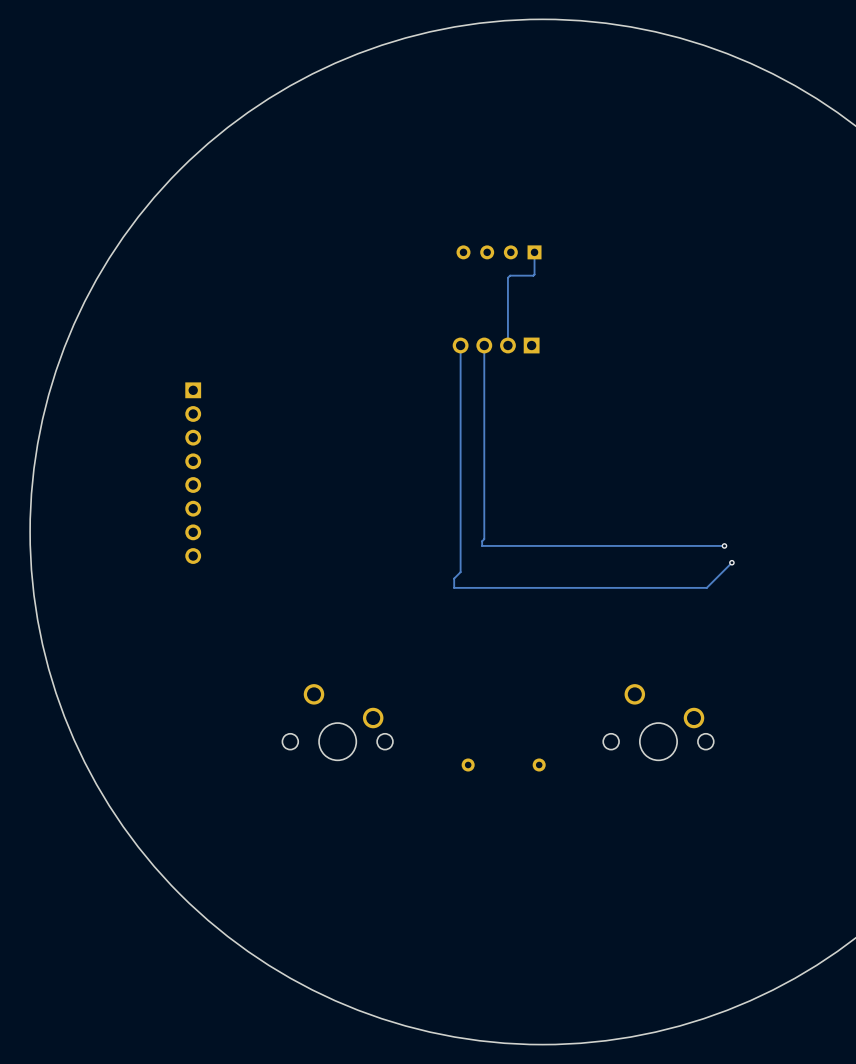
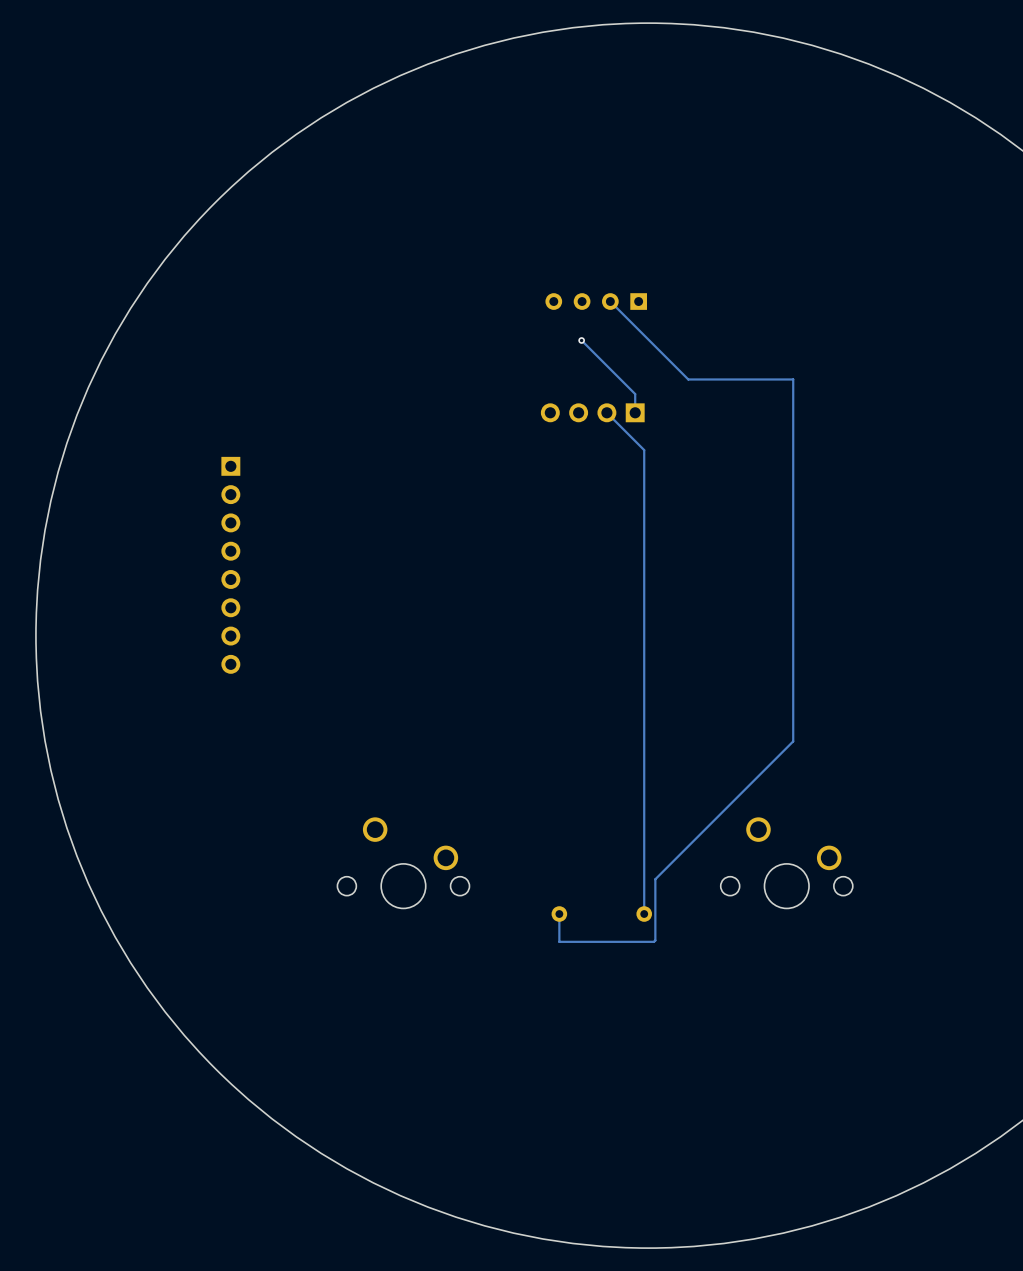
track: none -> (610, 301) (688, 379) (793, 379) (793, 741) (655, 879) (654, 941) (559, 941) (559, 914)
track: (534, 252) (533, 275) (510, 275) (507, 277) (507, 345) -> (644, 914) (644, 450) (606, 412)
track: none -> (581, 340) (635, 394) (635, 412)
via: none -> (581, 340)
track: (460, 345) (460, 572) (454, 578) (454, 587) (706, 587) (731, 562) -> none
track: (484, 345) (484, 539) (482, 545) (724, 545) -> none
via: (724, 545) -> none
via: (731, 562) -> none

